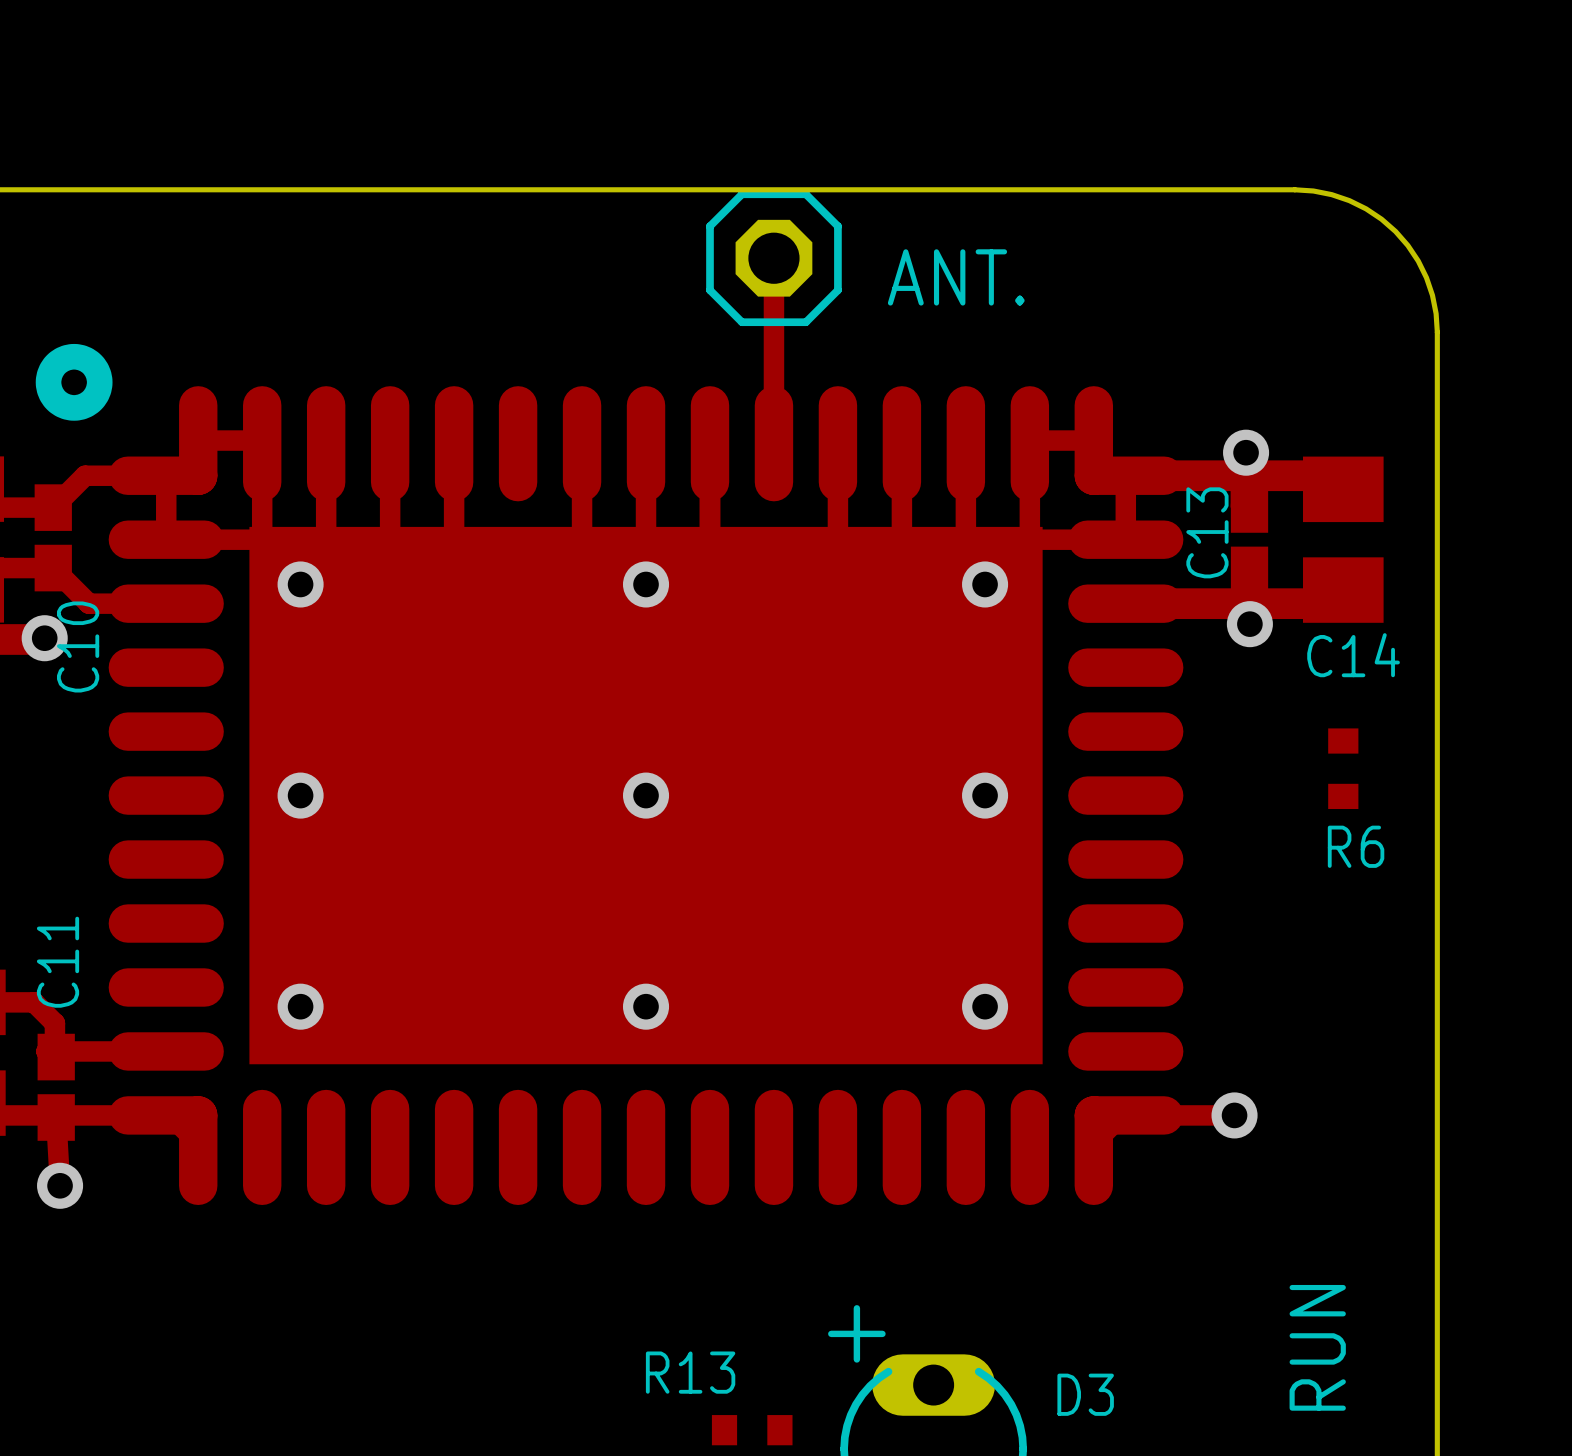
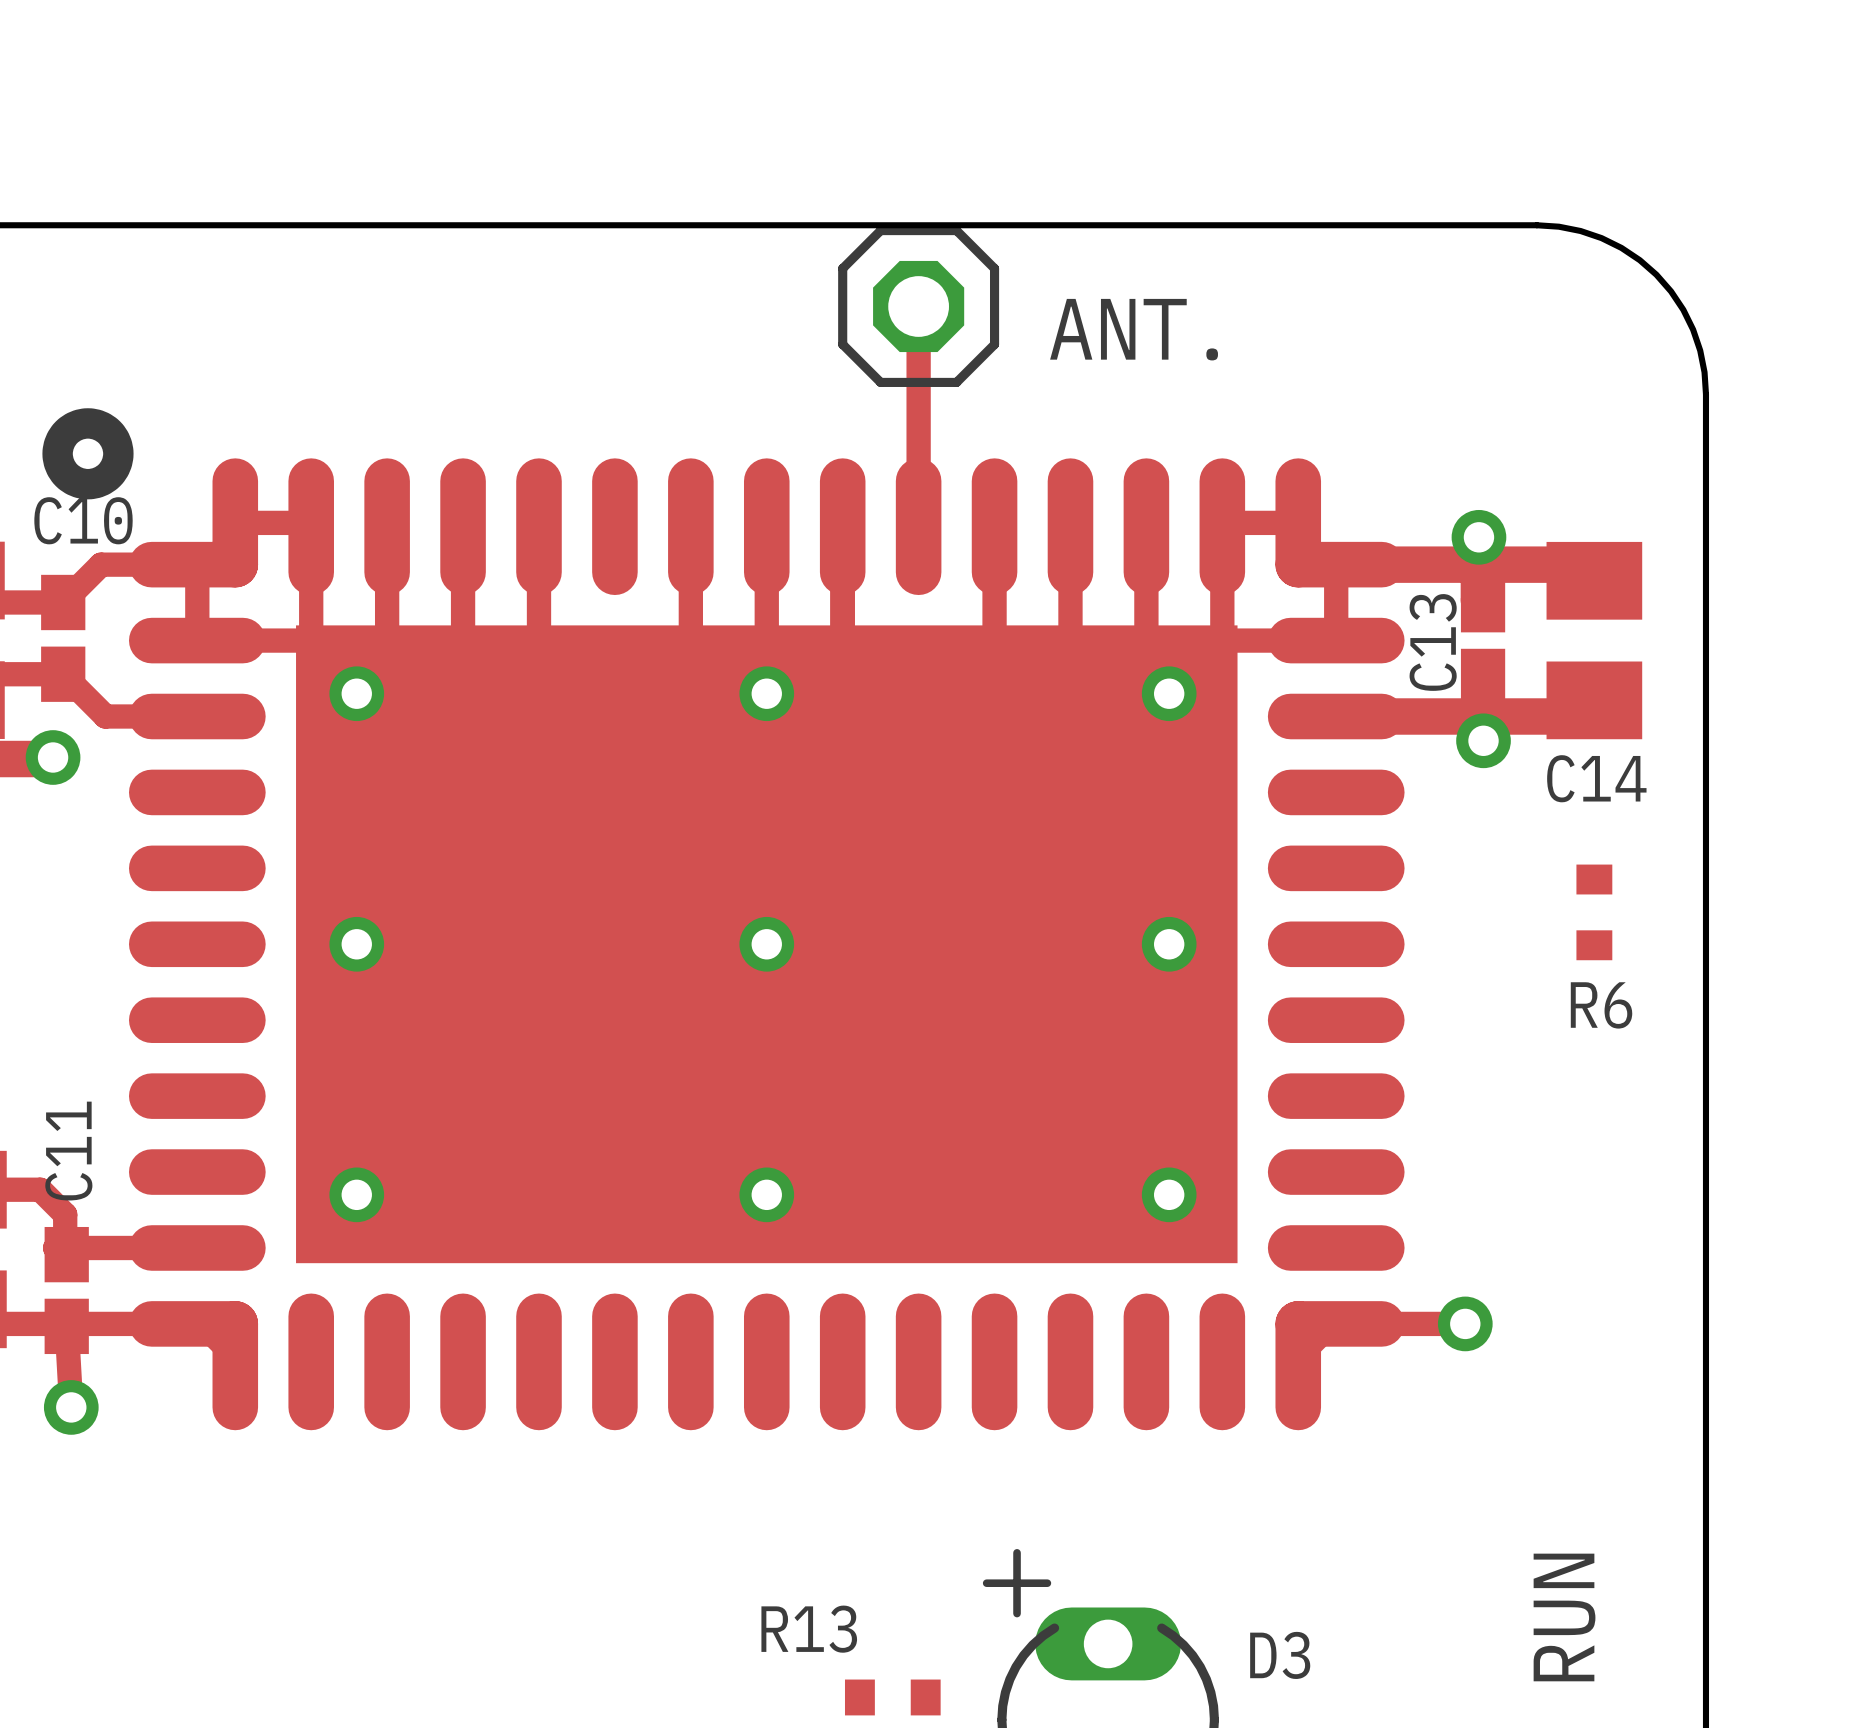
C10 name rotation: 0° (78, 646) -> 90° clockwise (83, 520)
C10 name position: C10 (78, 646) -> C10 (83, 520)

